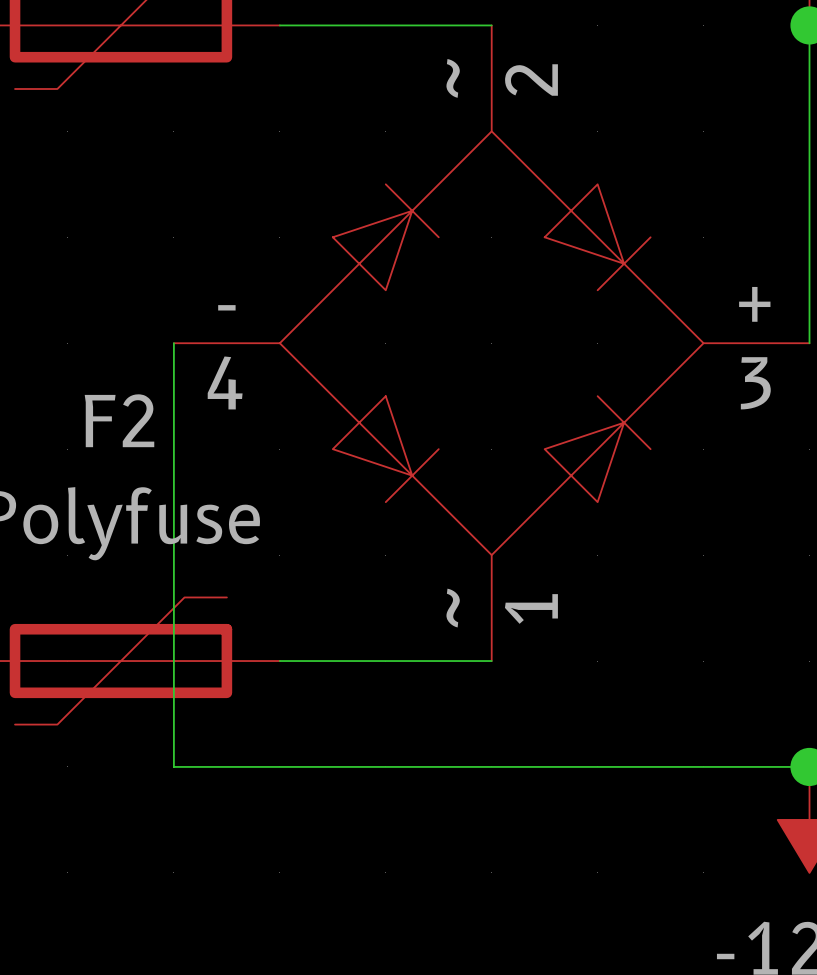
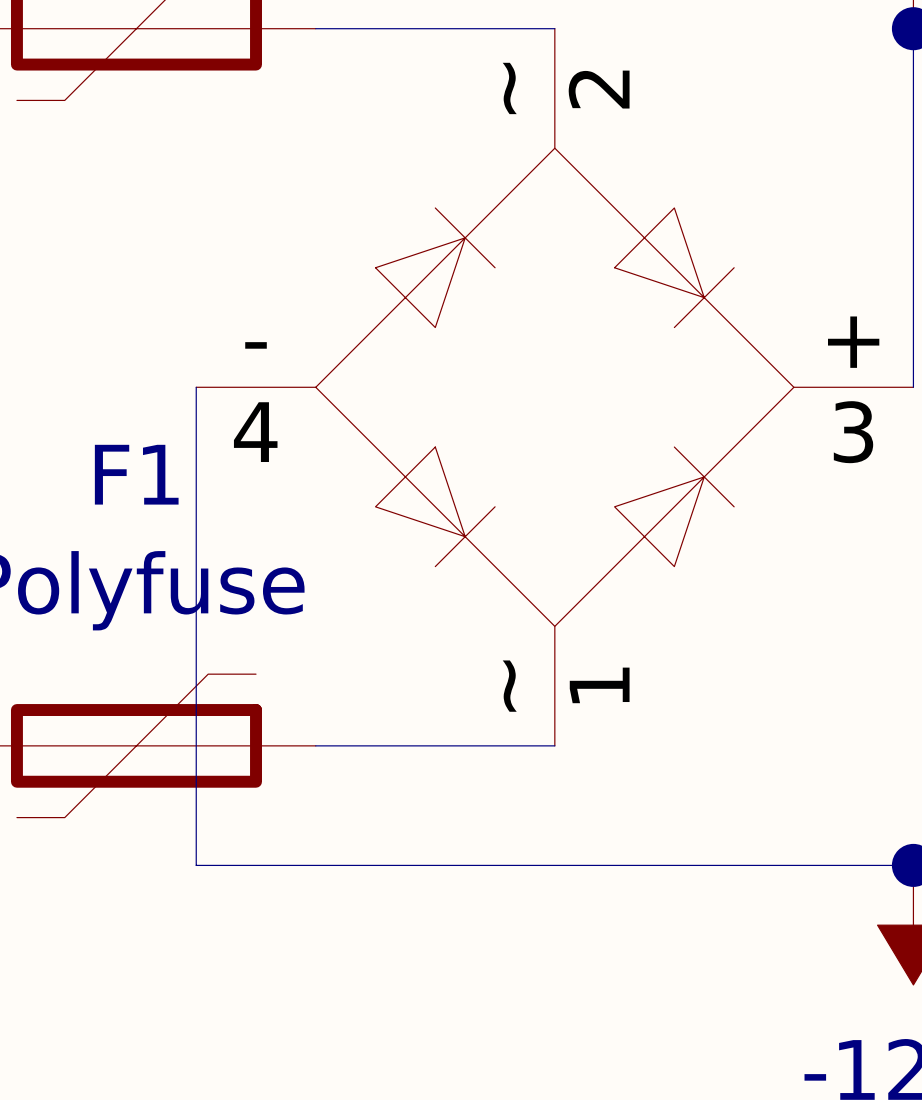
F2 name: F2 (119, 420) -> F1 (136, 474)

